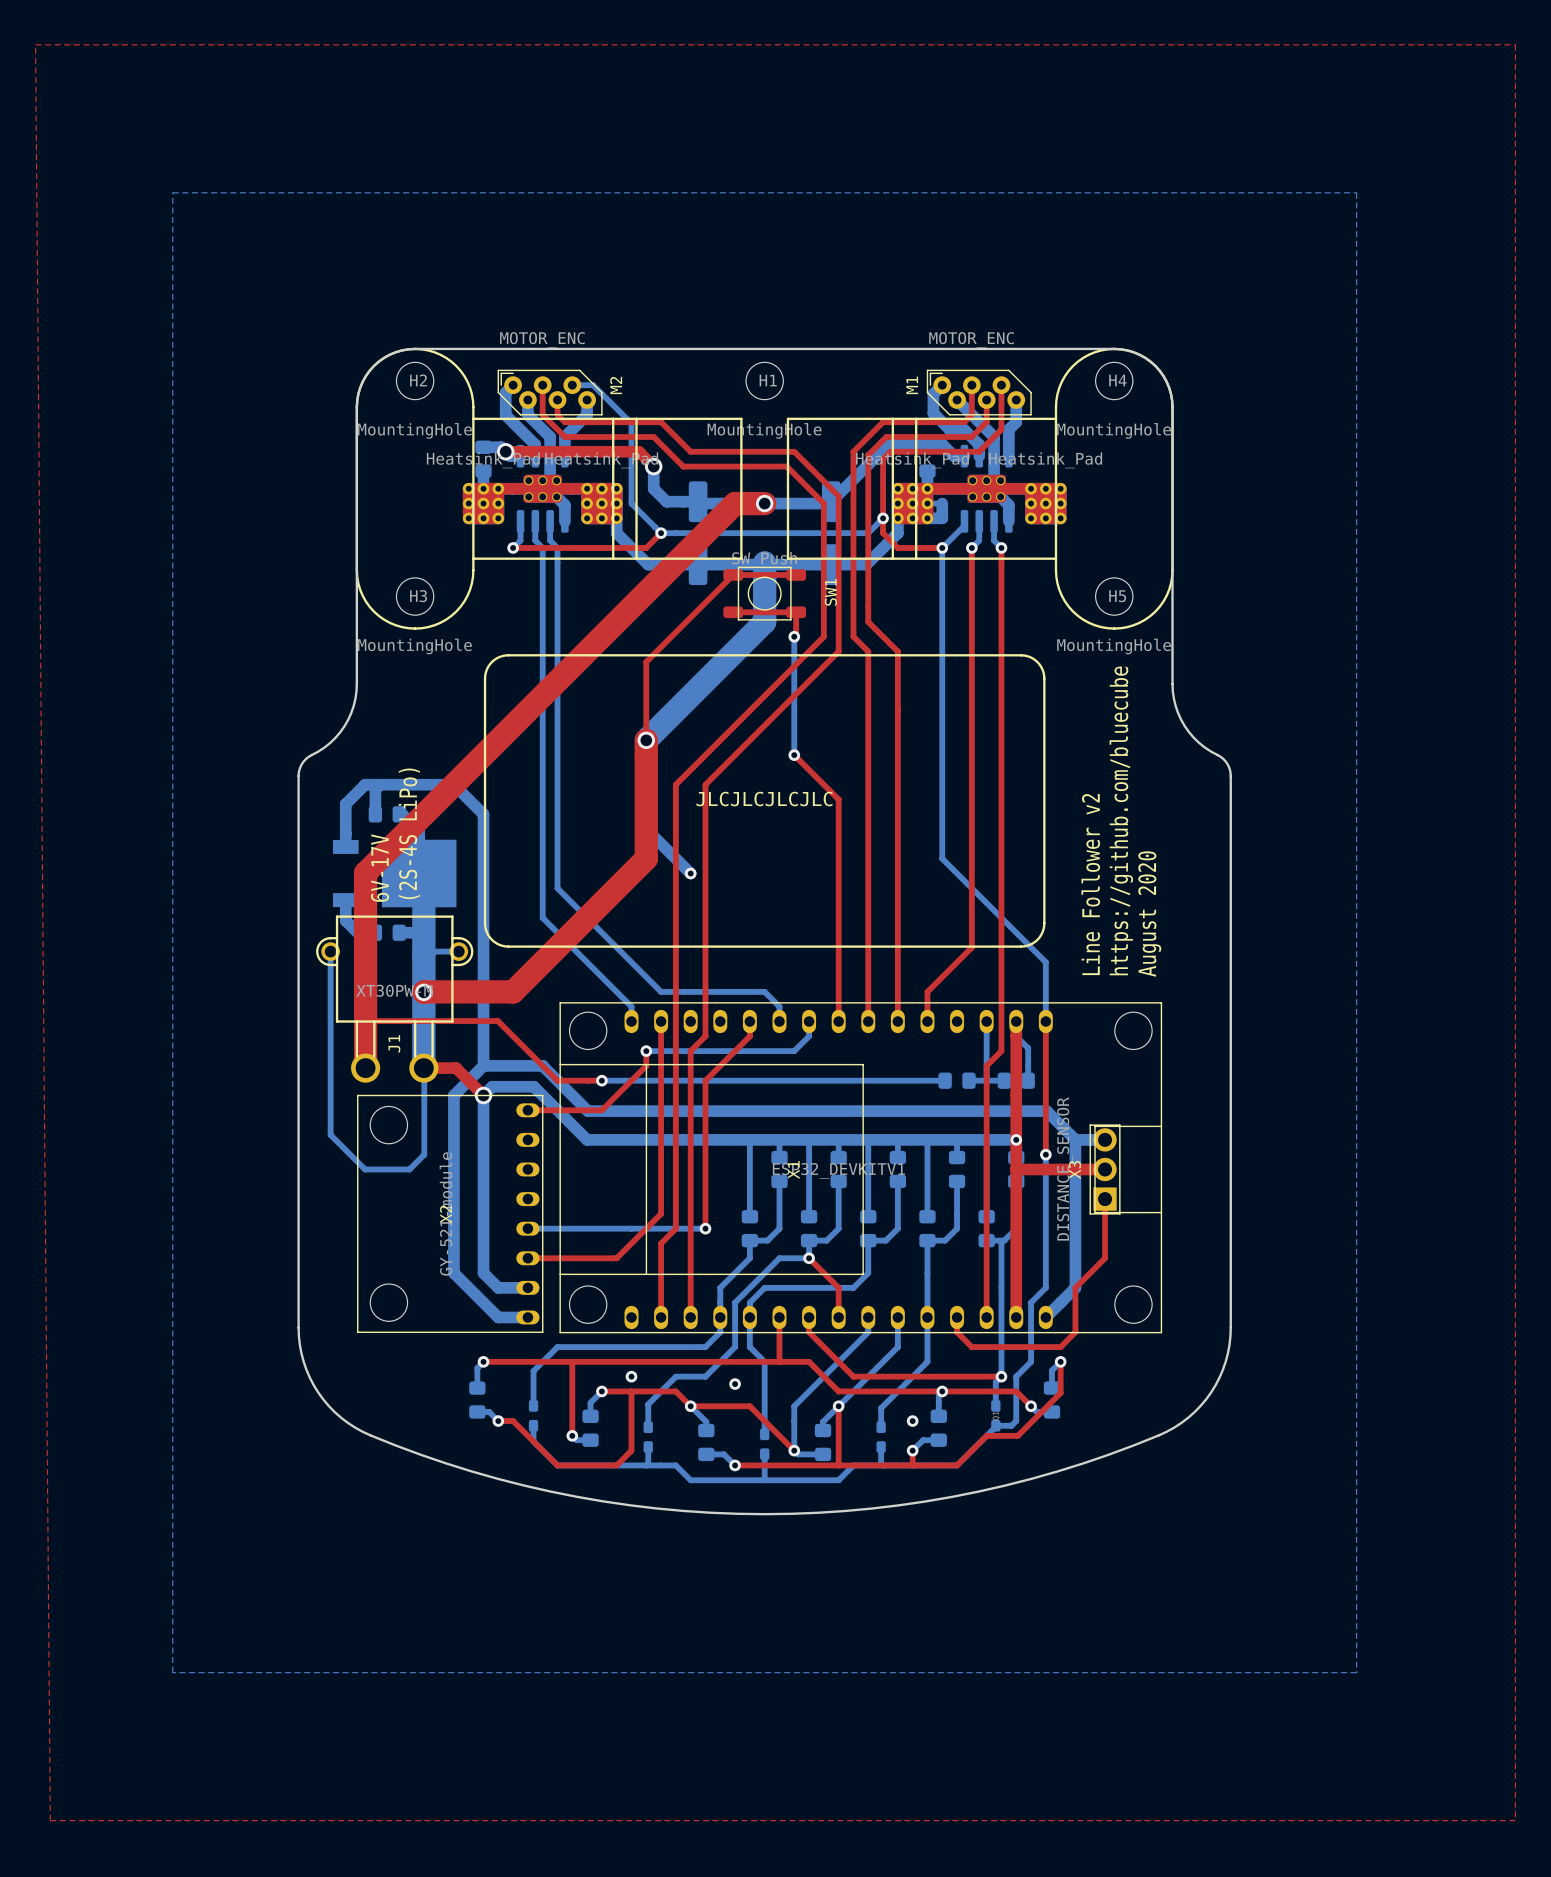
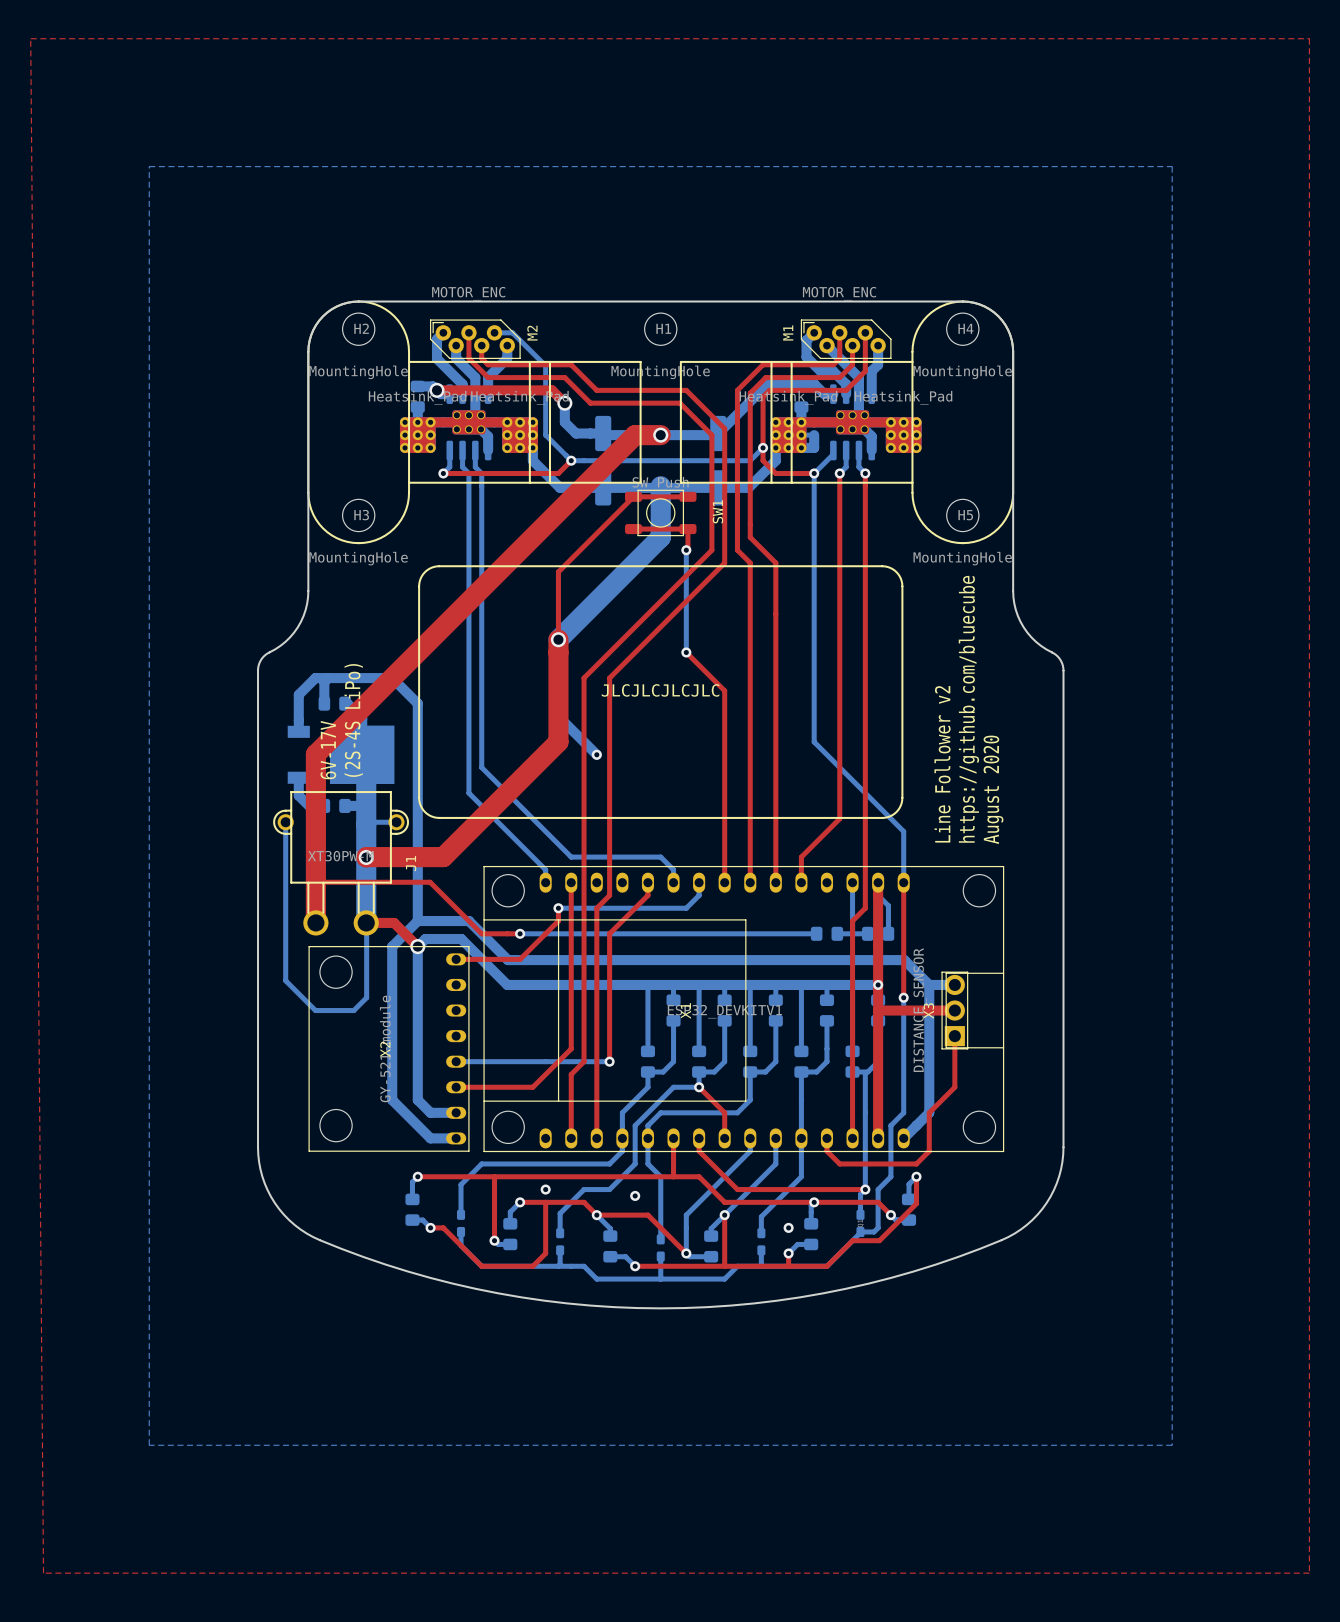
J1 name position: J1 (394, 1043) -> J1 (411, 863)

